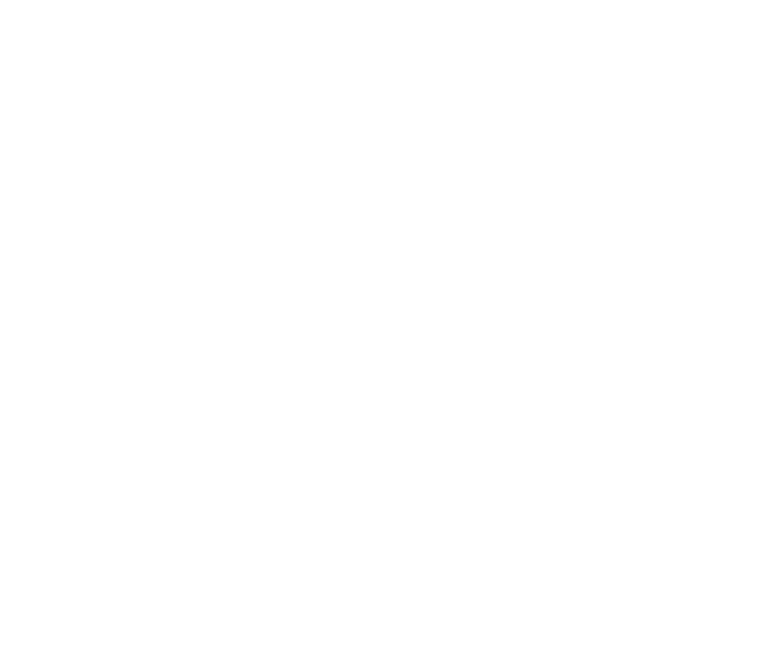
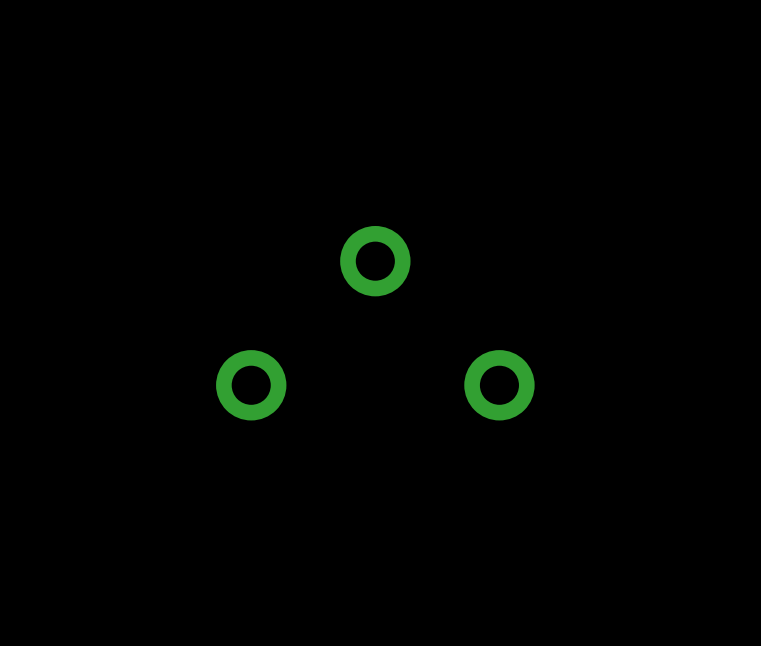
part: none -> (375, 323)

